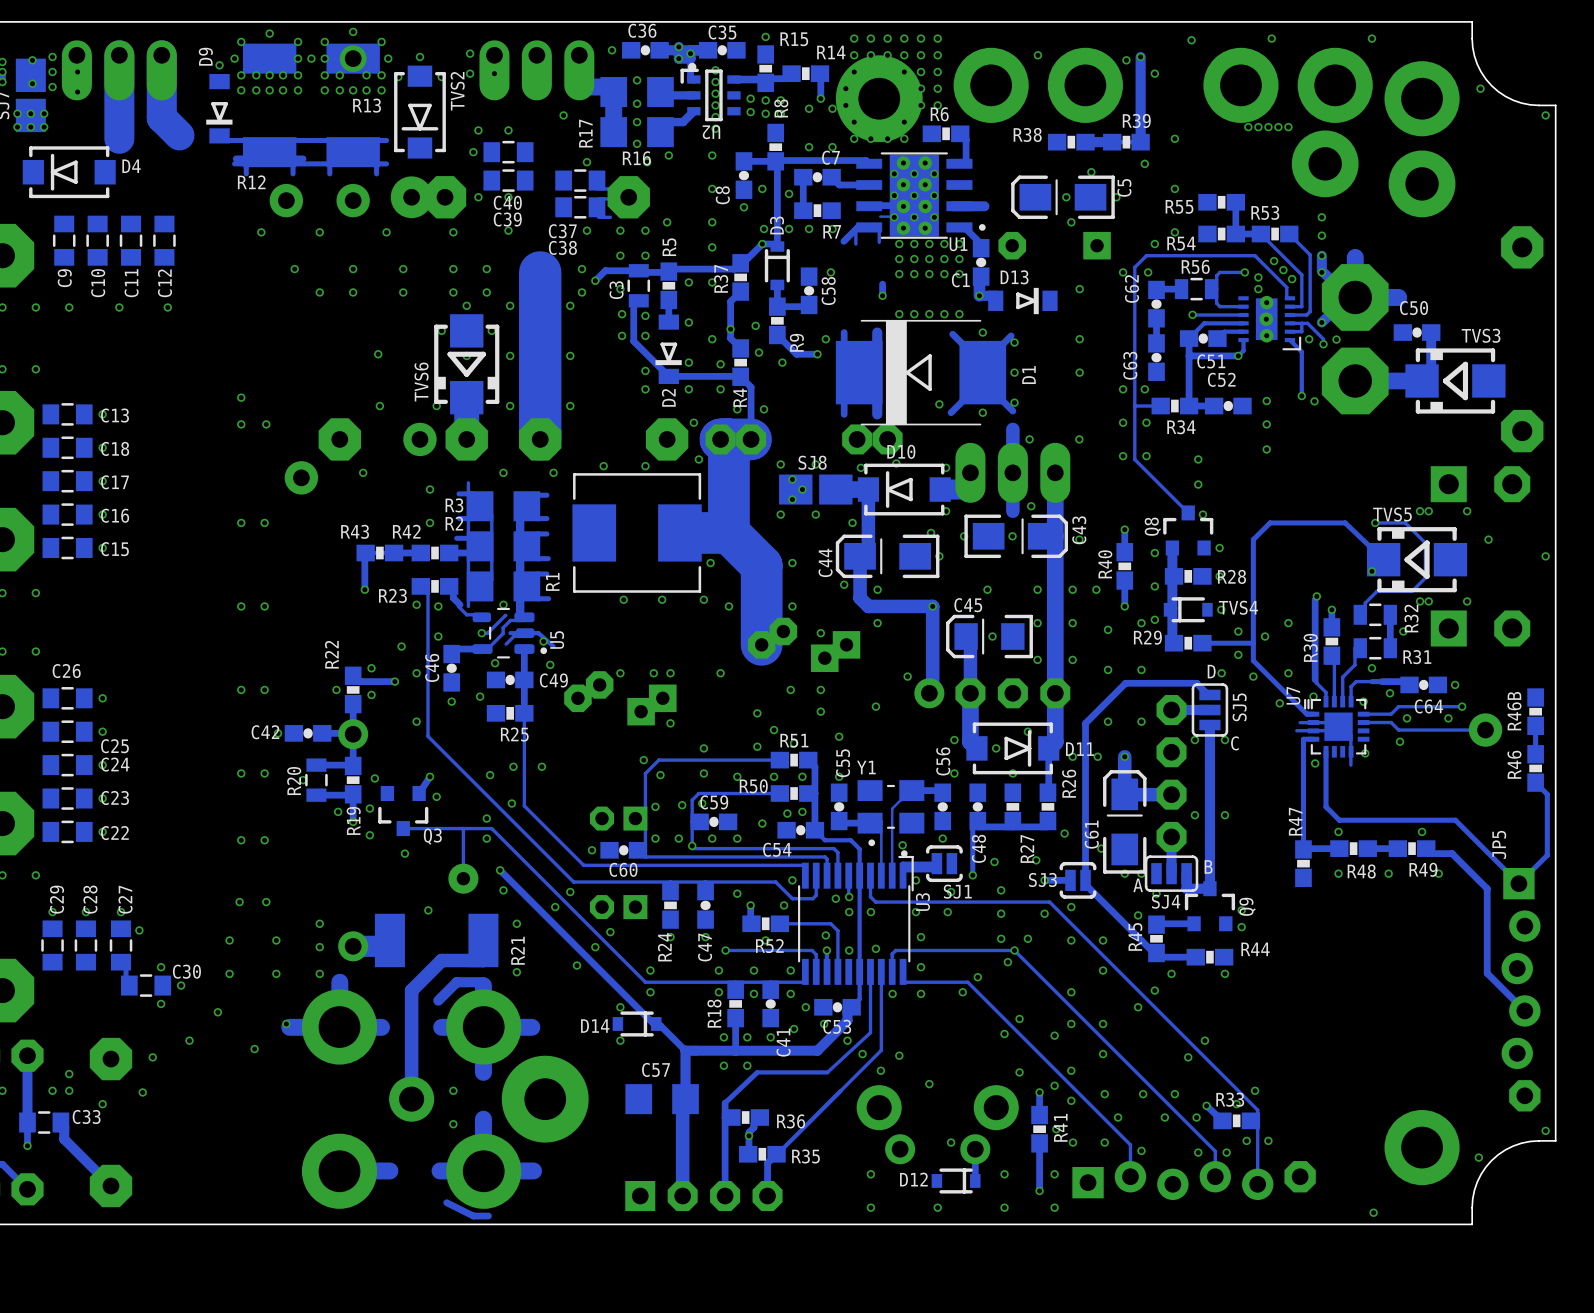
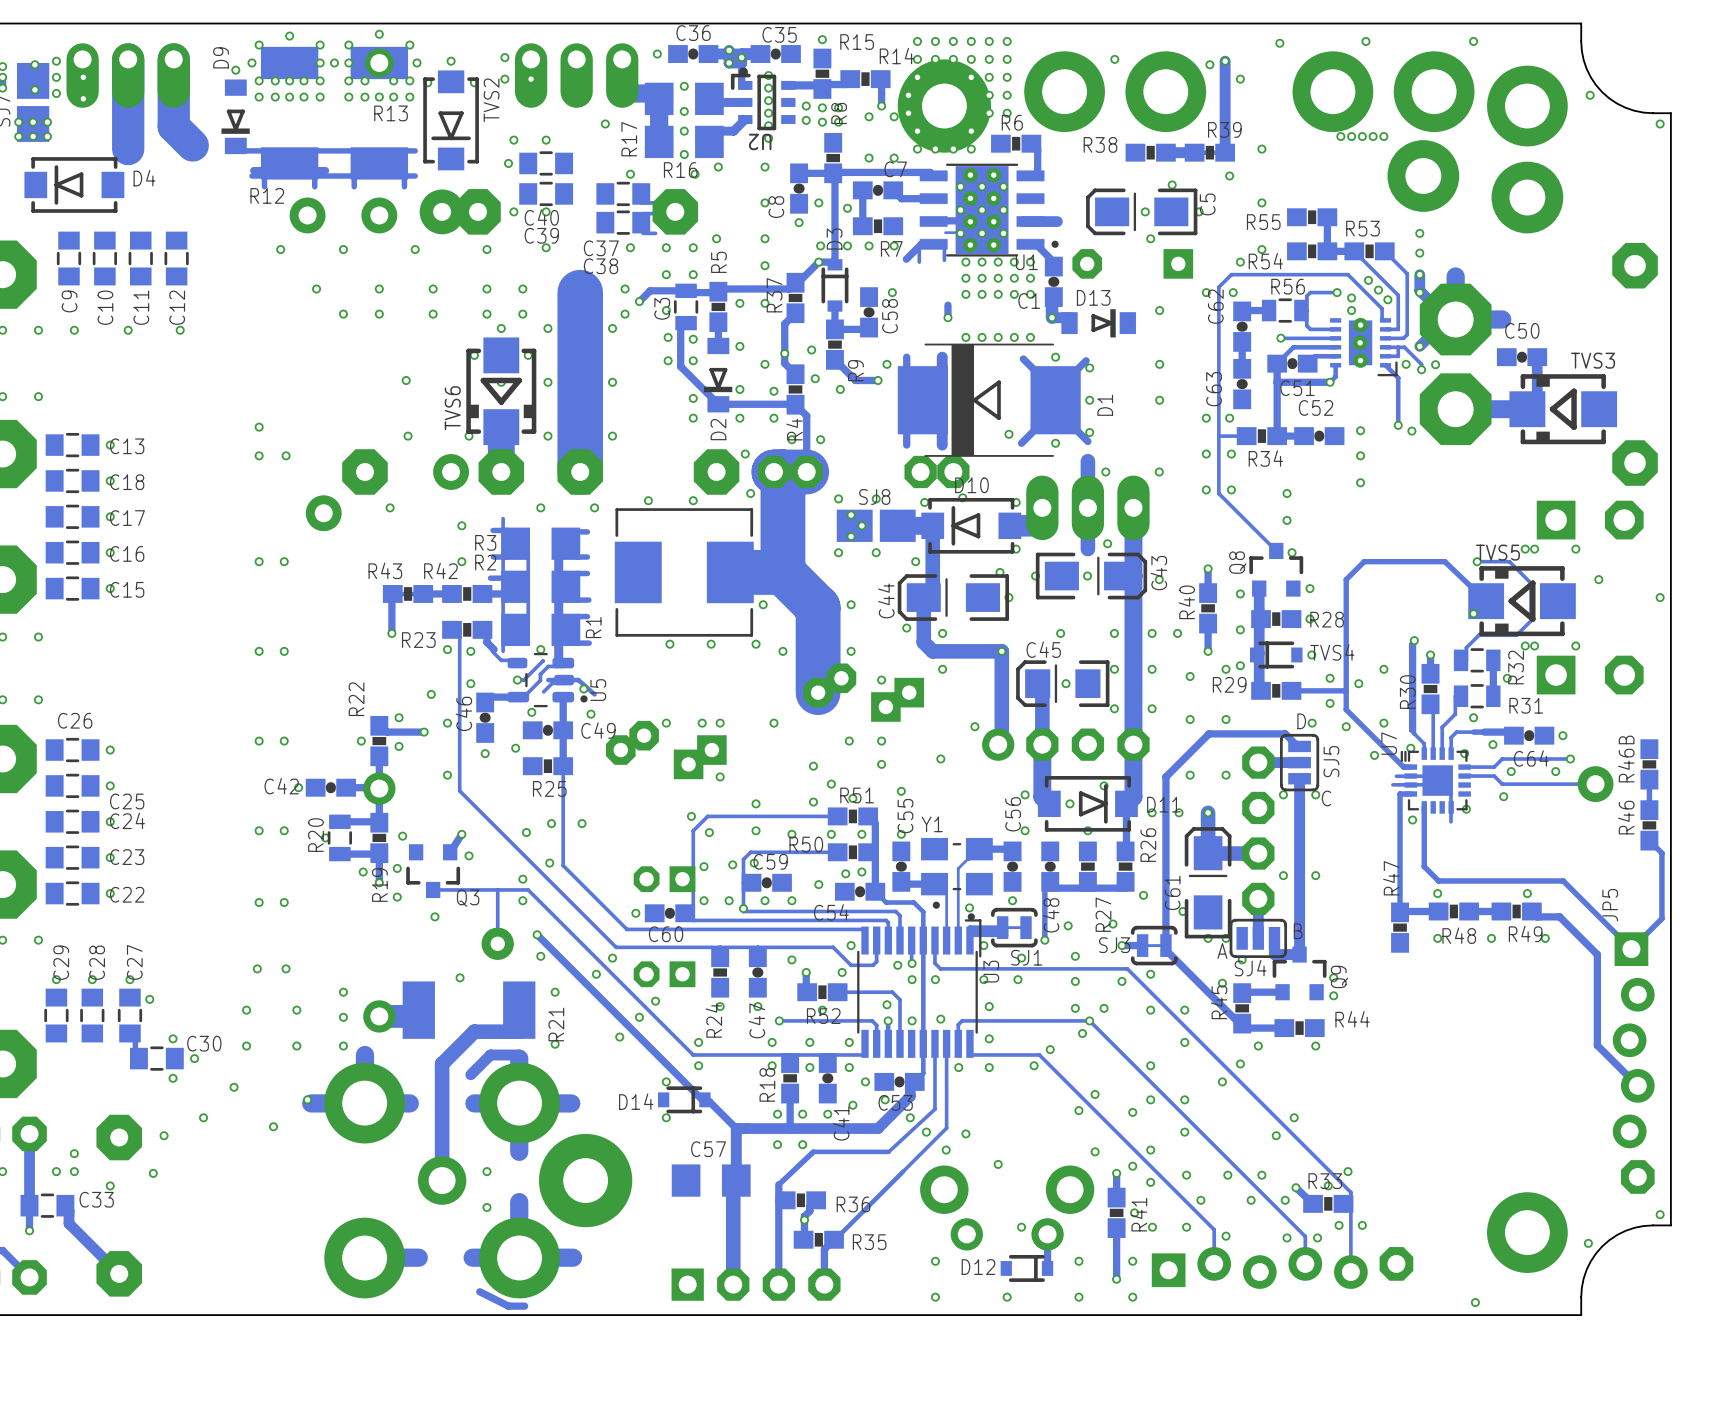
SJ1 footprint: [925, 845, 963, 883] -> [990, 907, 1038, 948]
SJ3 footprint: [1059, 861, 1097, 899] -> [1130, 925, 1178, 966]

